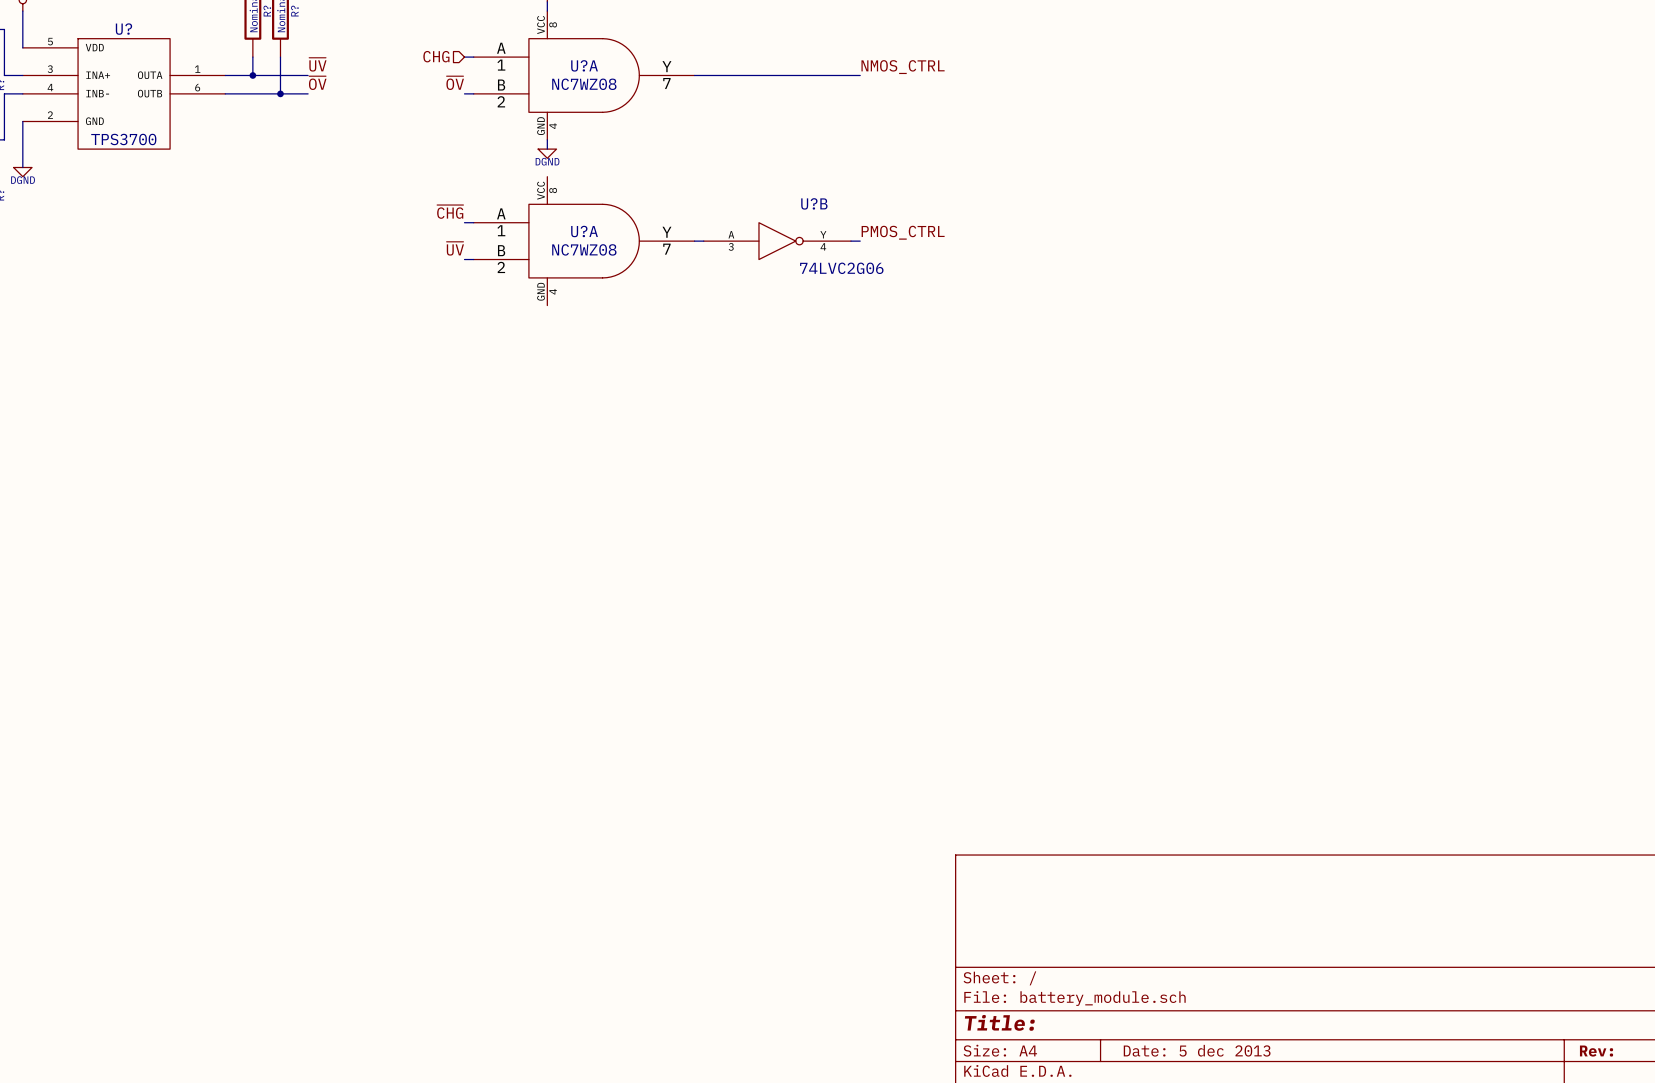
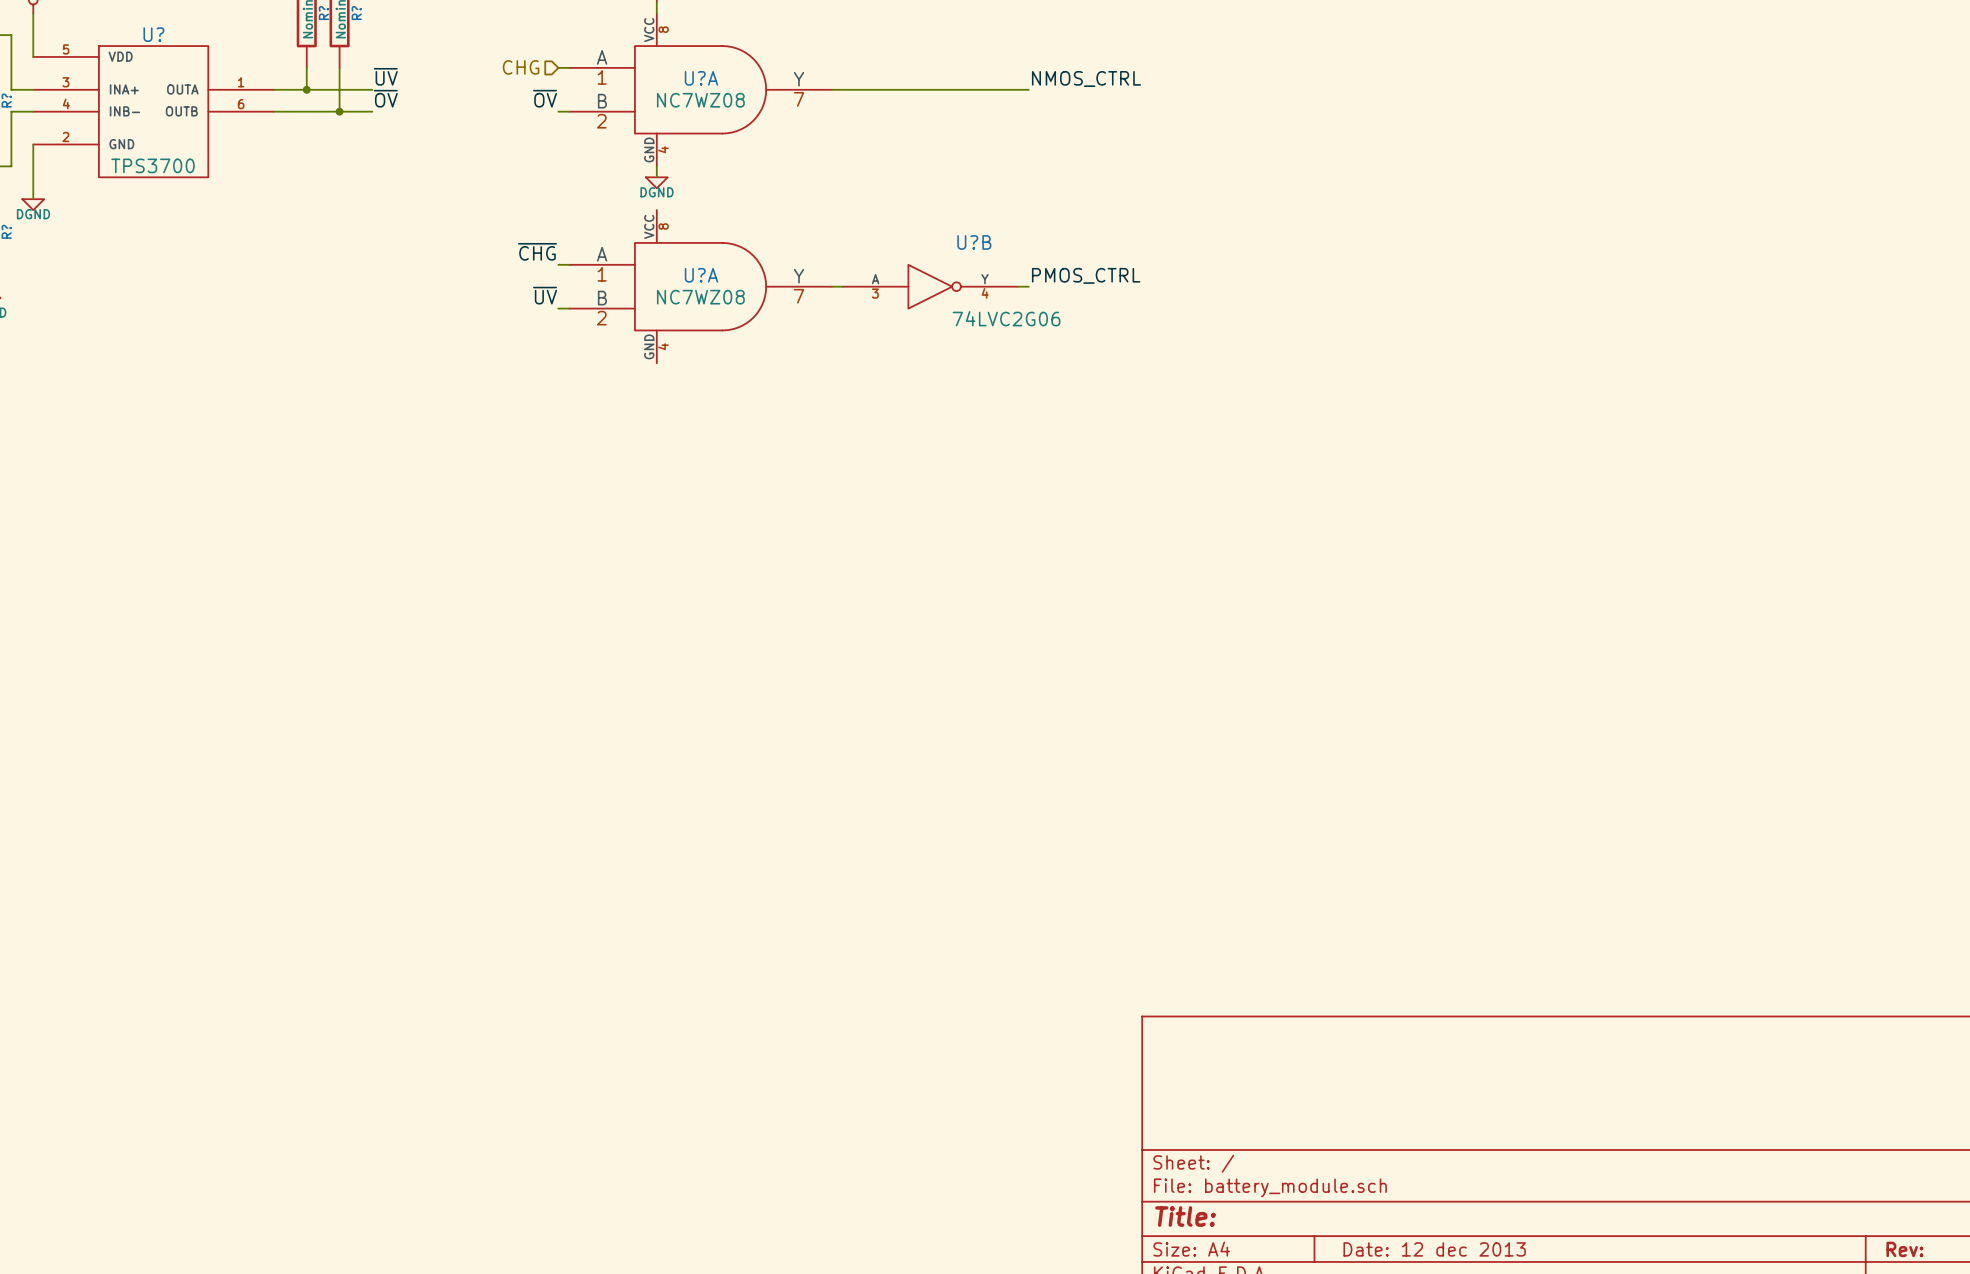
title block: Date: 5 dec 2013 (1197, 1050) -> Date: 12 dec 2013 (1434, 1249)

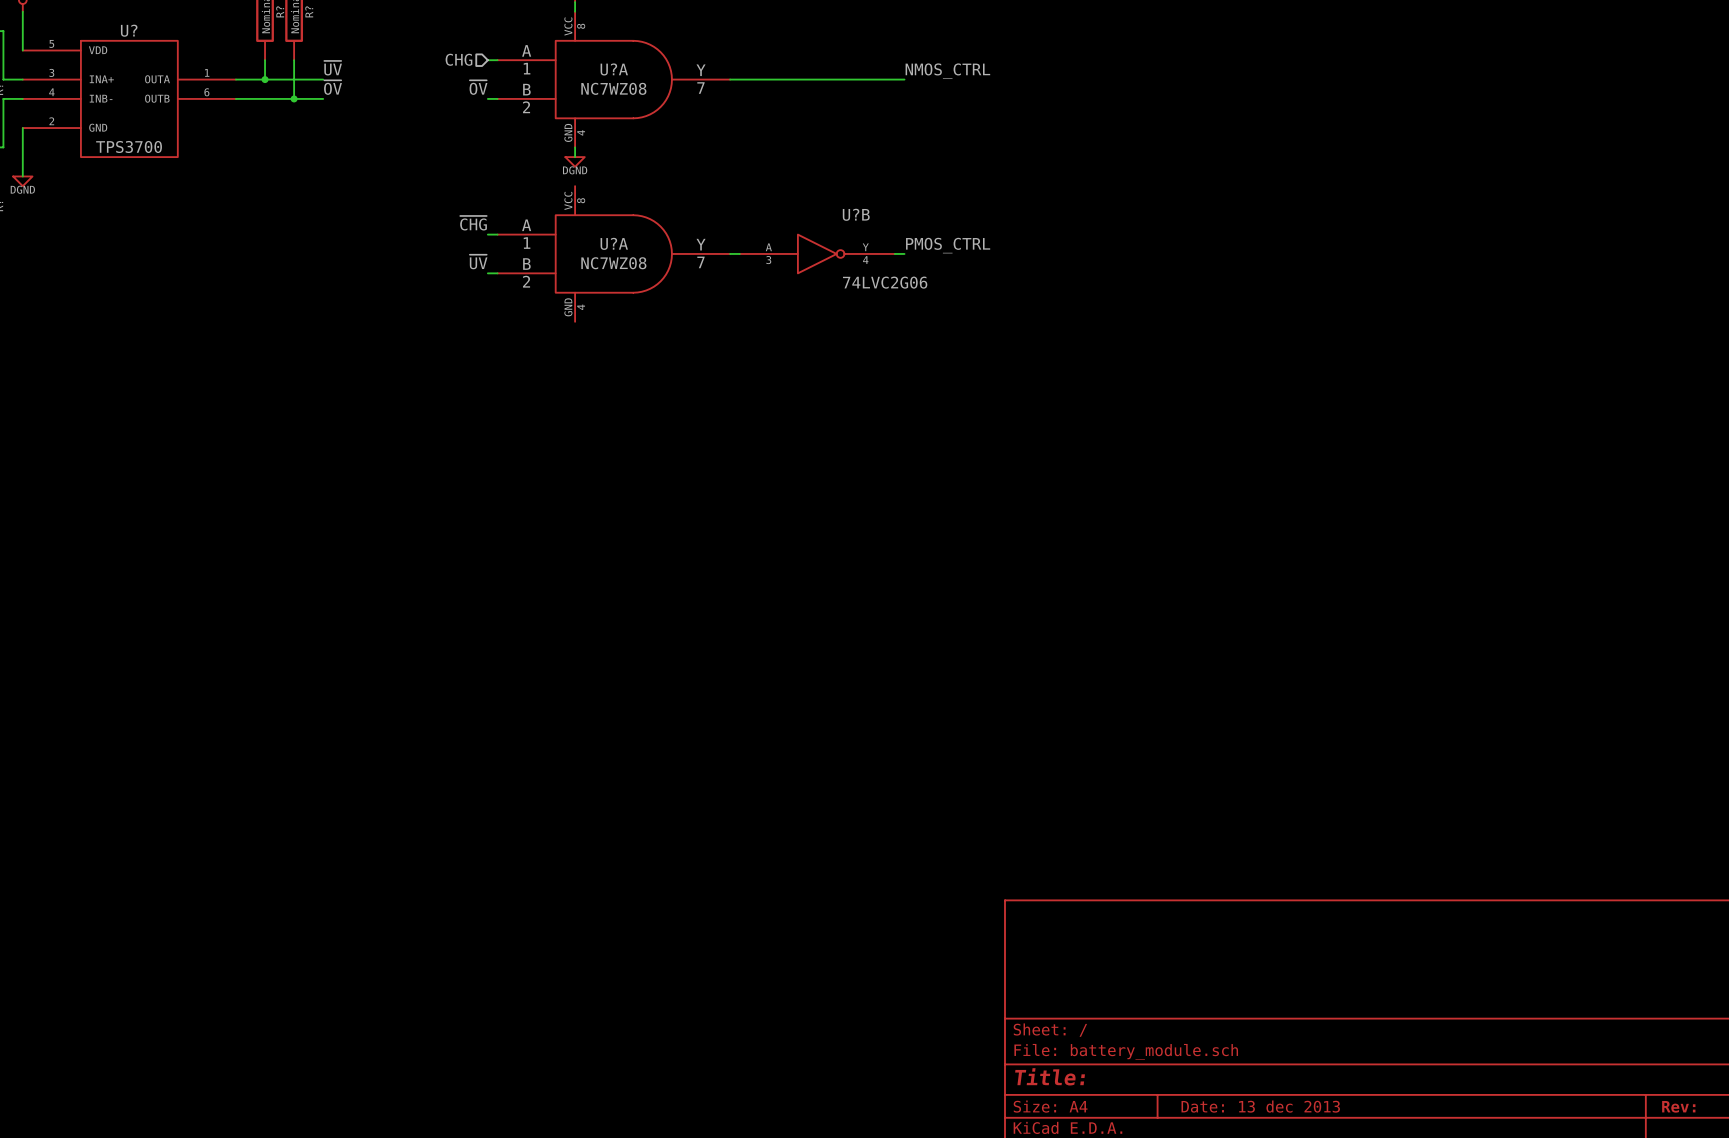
title block: Date: 12 dec 2013 (1434, 1249) -> Date: 13 dec 2013 (1260, 1106)

